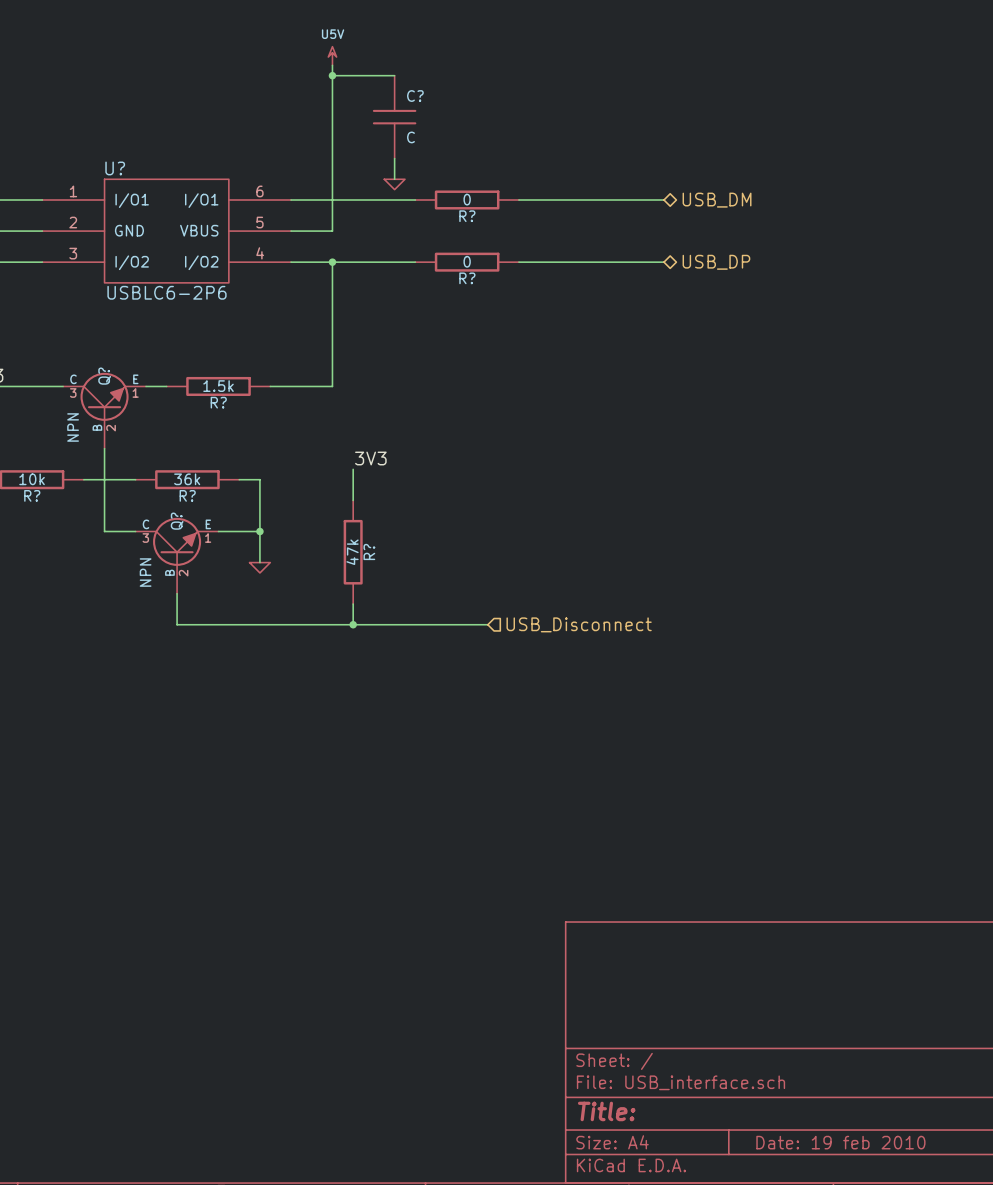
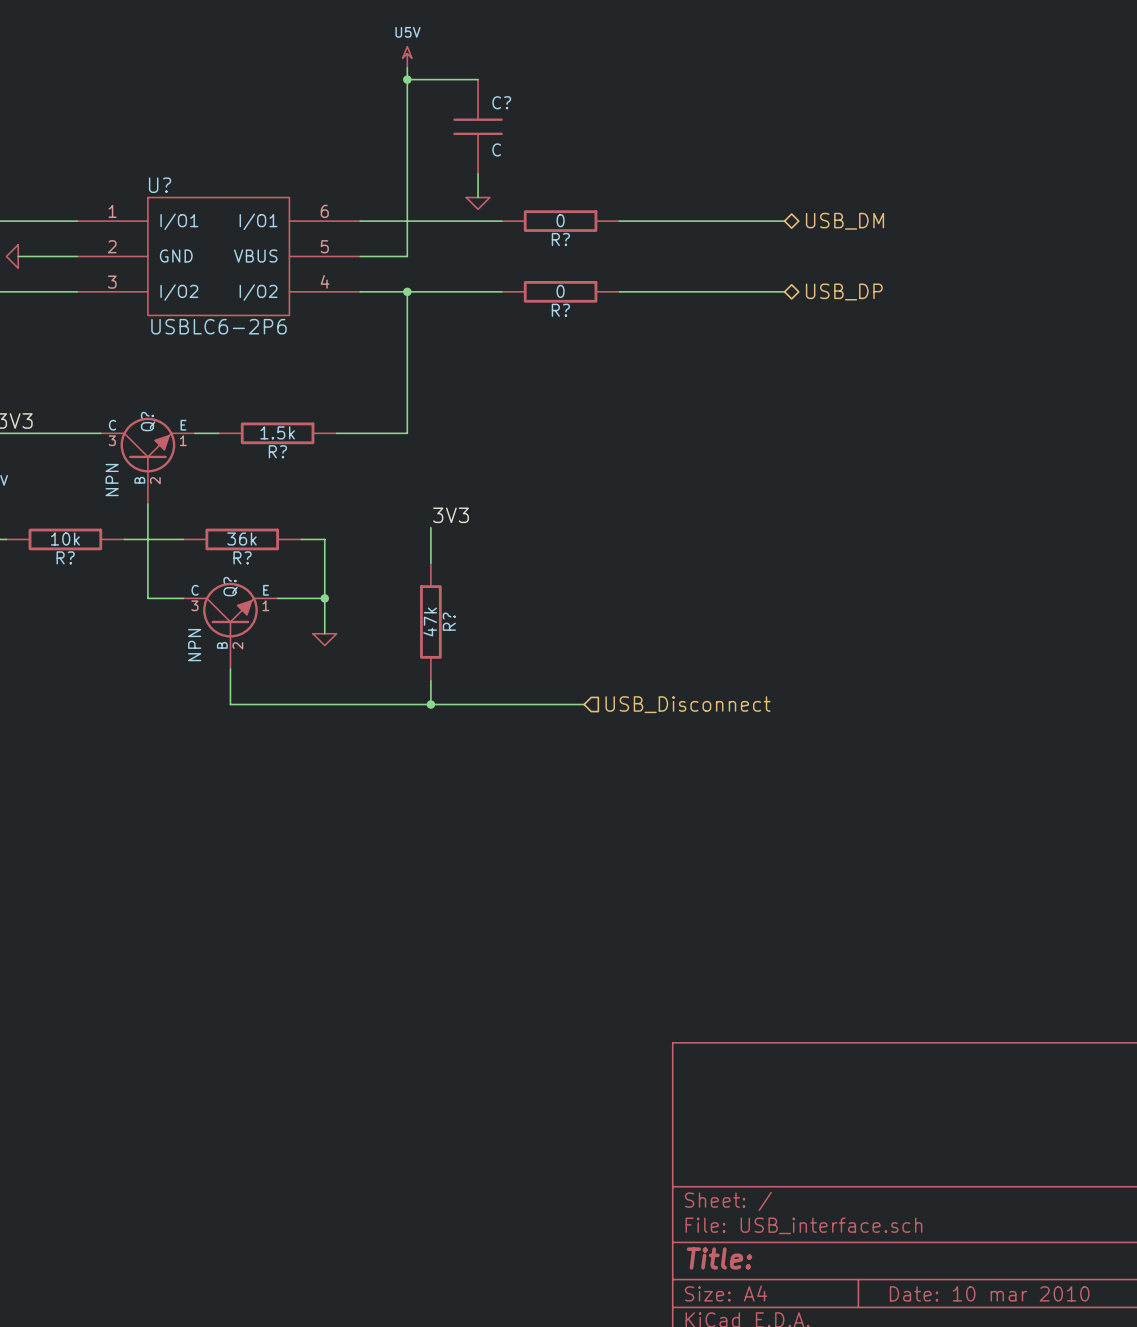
title block: Date: 19 feb 2010 (840, 1142) -> Date: 10 mar 2010 (989, 1293)

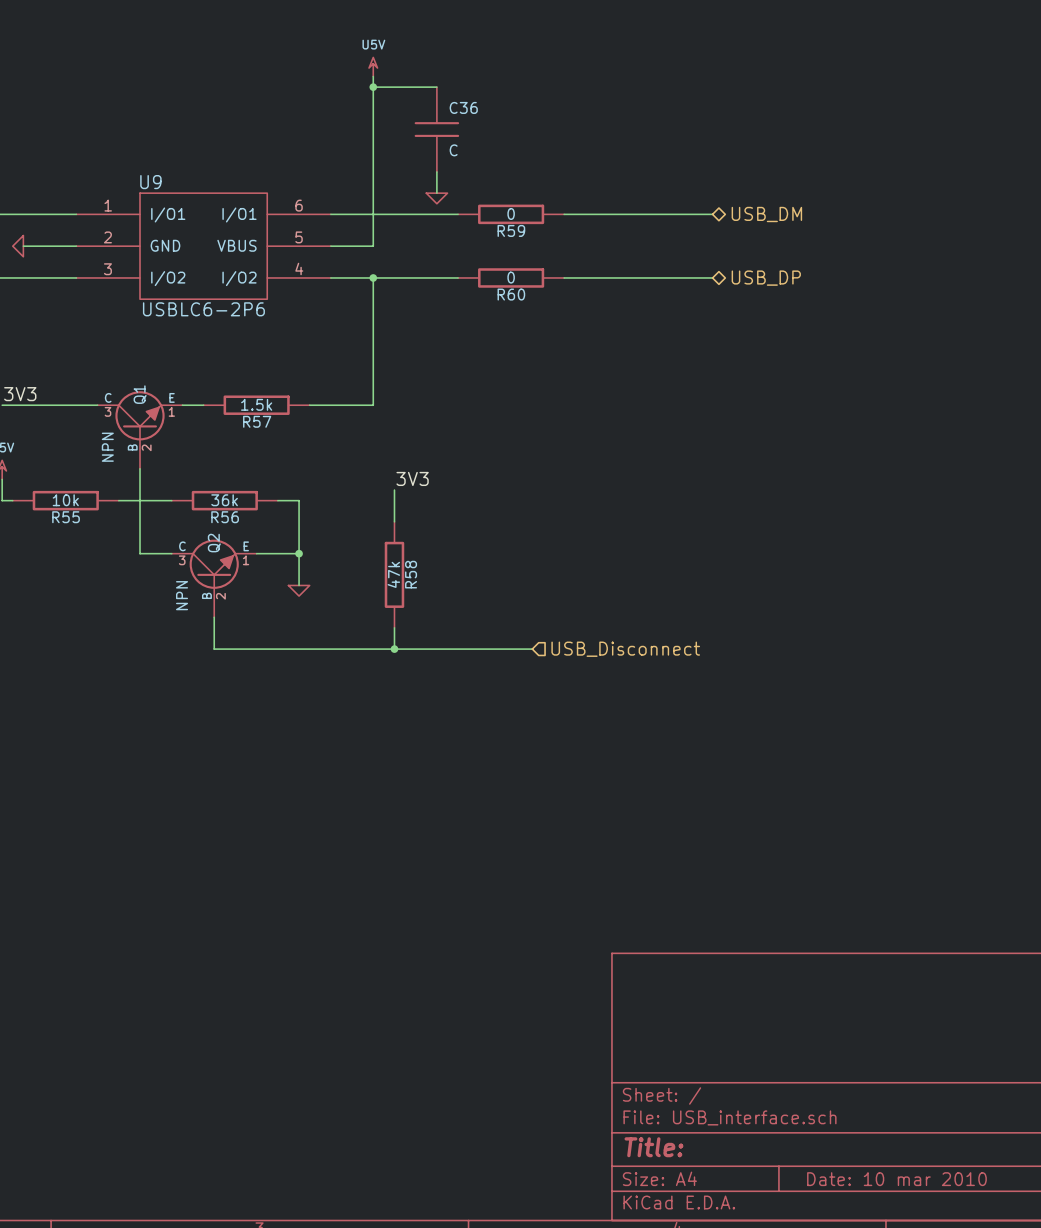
C? name: C? (501, 102) -> C36 (463, 107)
U? name: U? (160, 185) -> U9 (150, 182)
R? name: R? (560, 239) -> R59 (511, 230)
R? name: R? (560, 310) -> R60 (511, 294)
Q? name: Q? (148, 421) -> Q1 (140, 394)
R? name: R? (277, 451) -> R57 (257, 421)
R? name: R? (65, 557) -> R55 (66, 517)
R? name: R? (242, 557) -> R56 (225, 517)
Q? name: Q? (230, 586) -> Q2 (214, 543)
R? name: R? (449, 621) -> R58 (411, 574)

